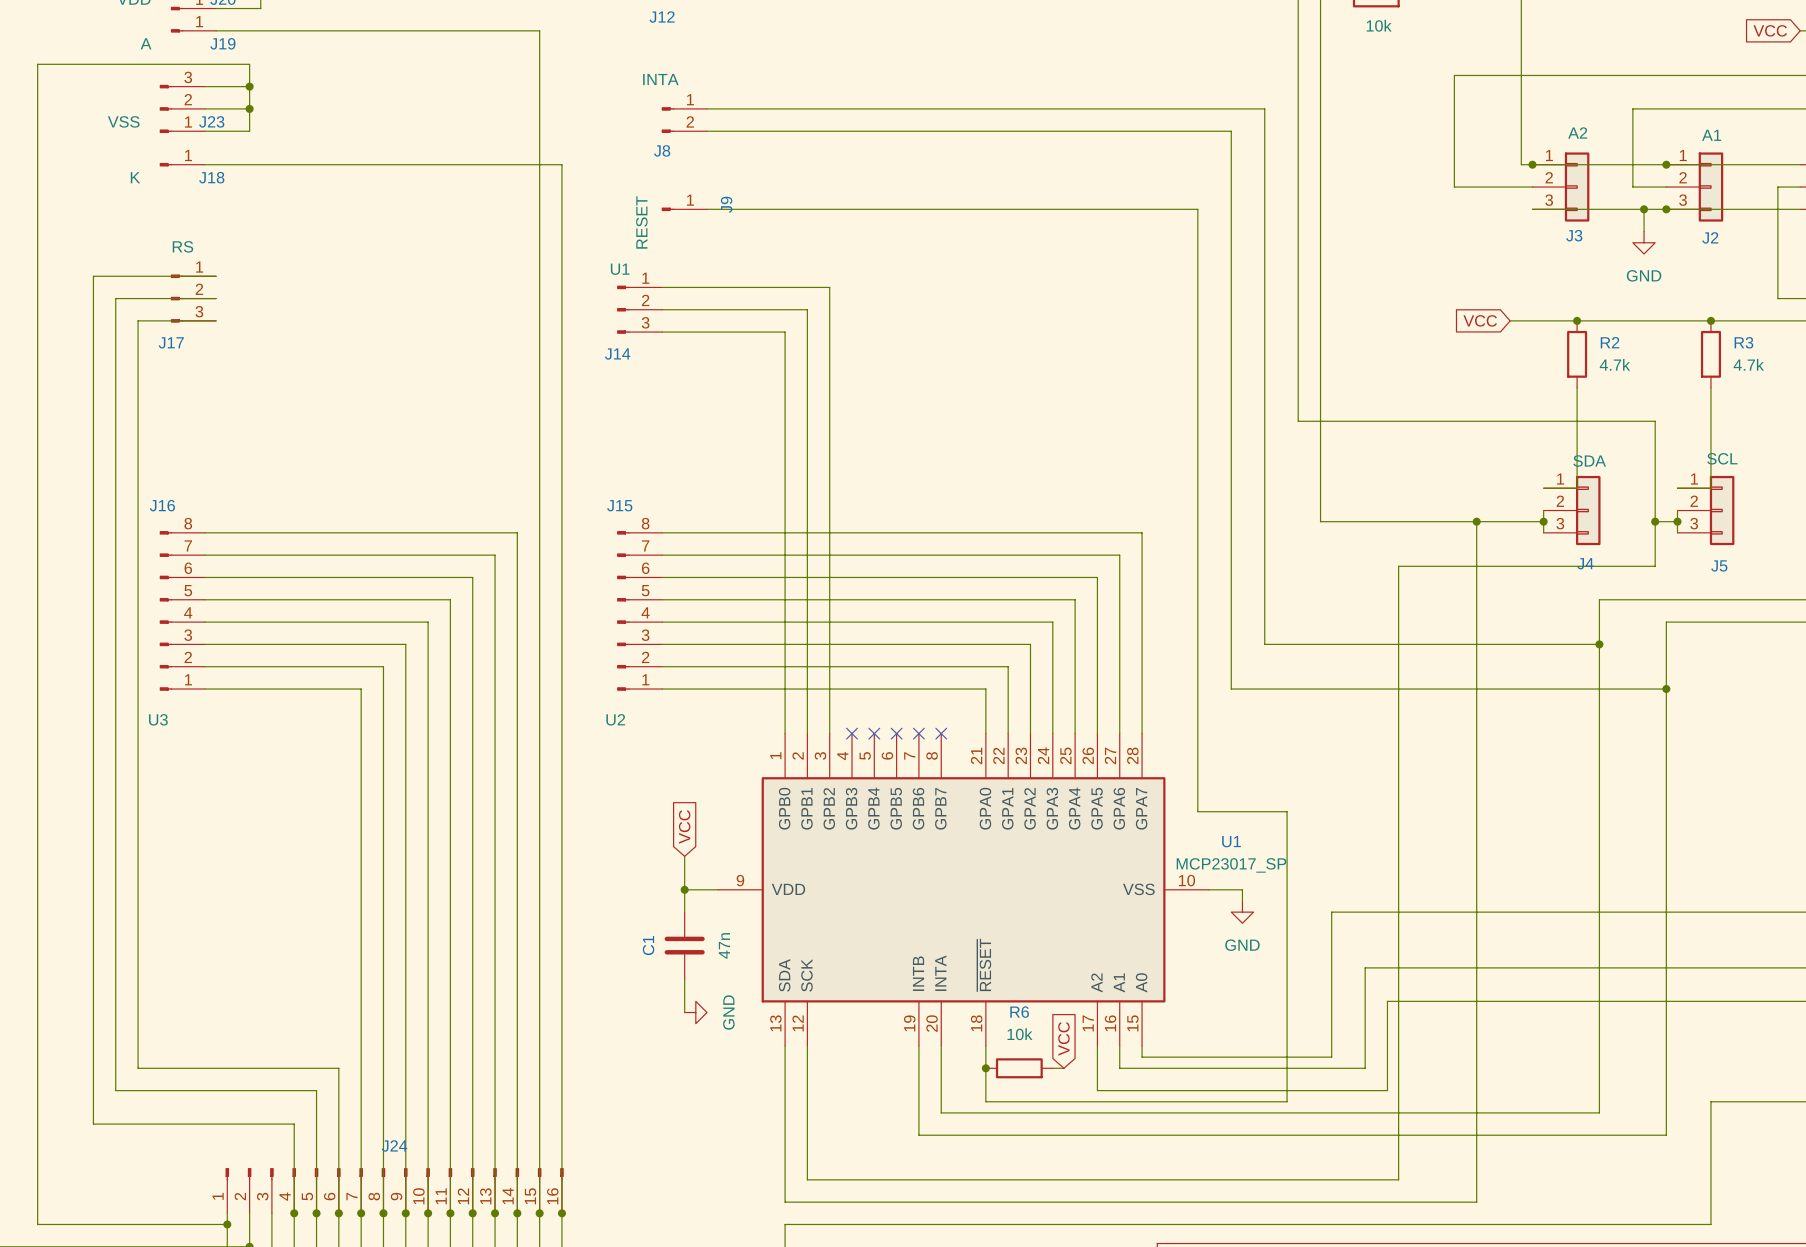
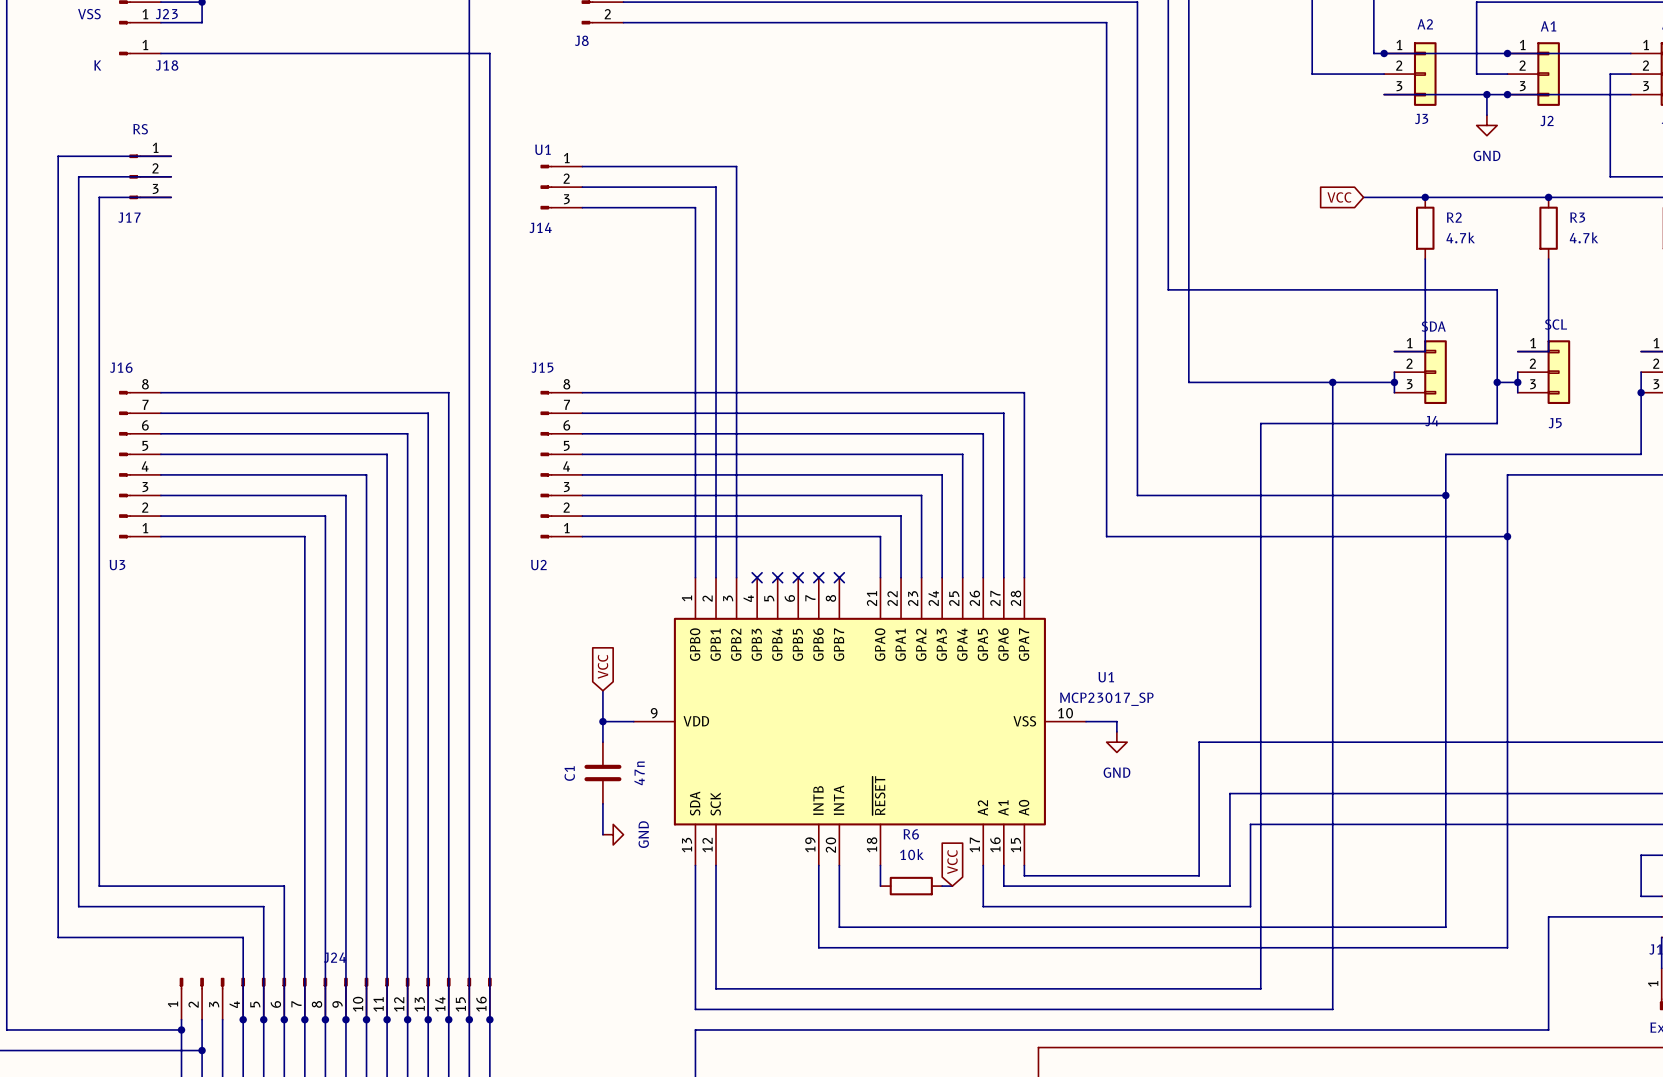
J9: RESET (684, 209) -> none
wire: (706, 209) (1197, 209) (1197, 811) (1287, 811) (1287, 1101) (985, 1101) (985, 1068) -> none
junction: (985, 1068) -> none

